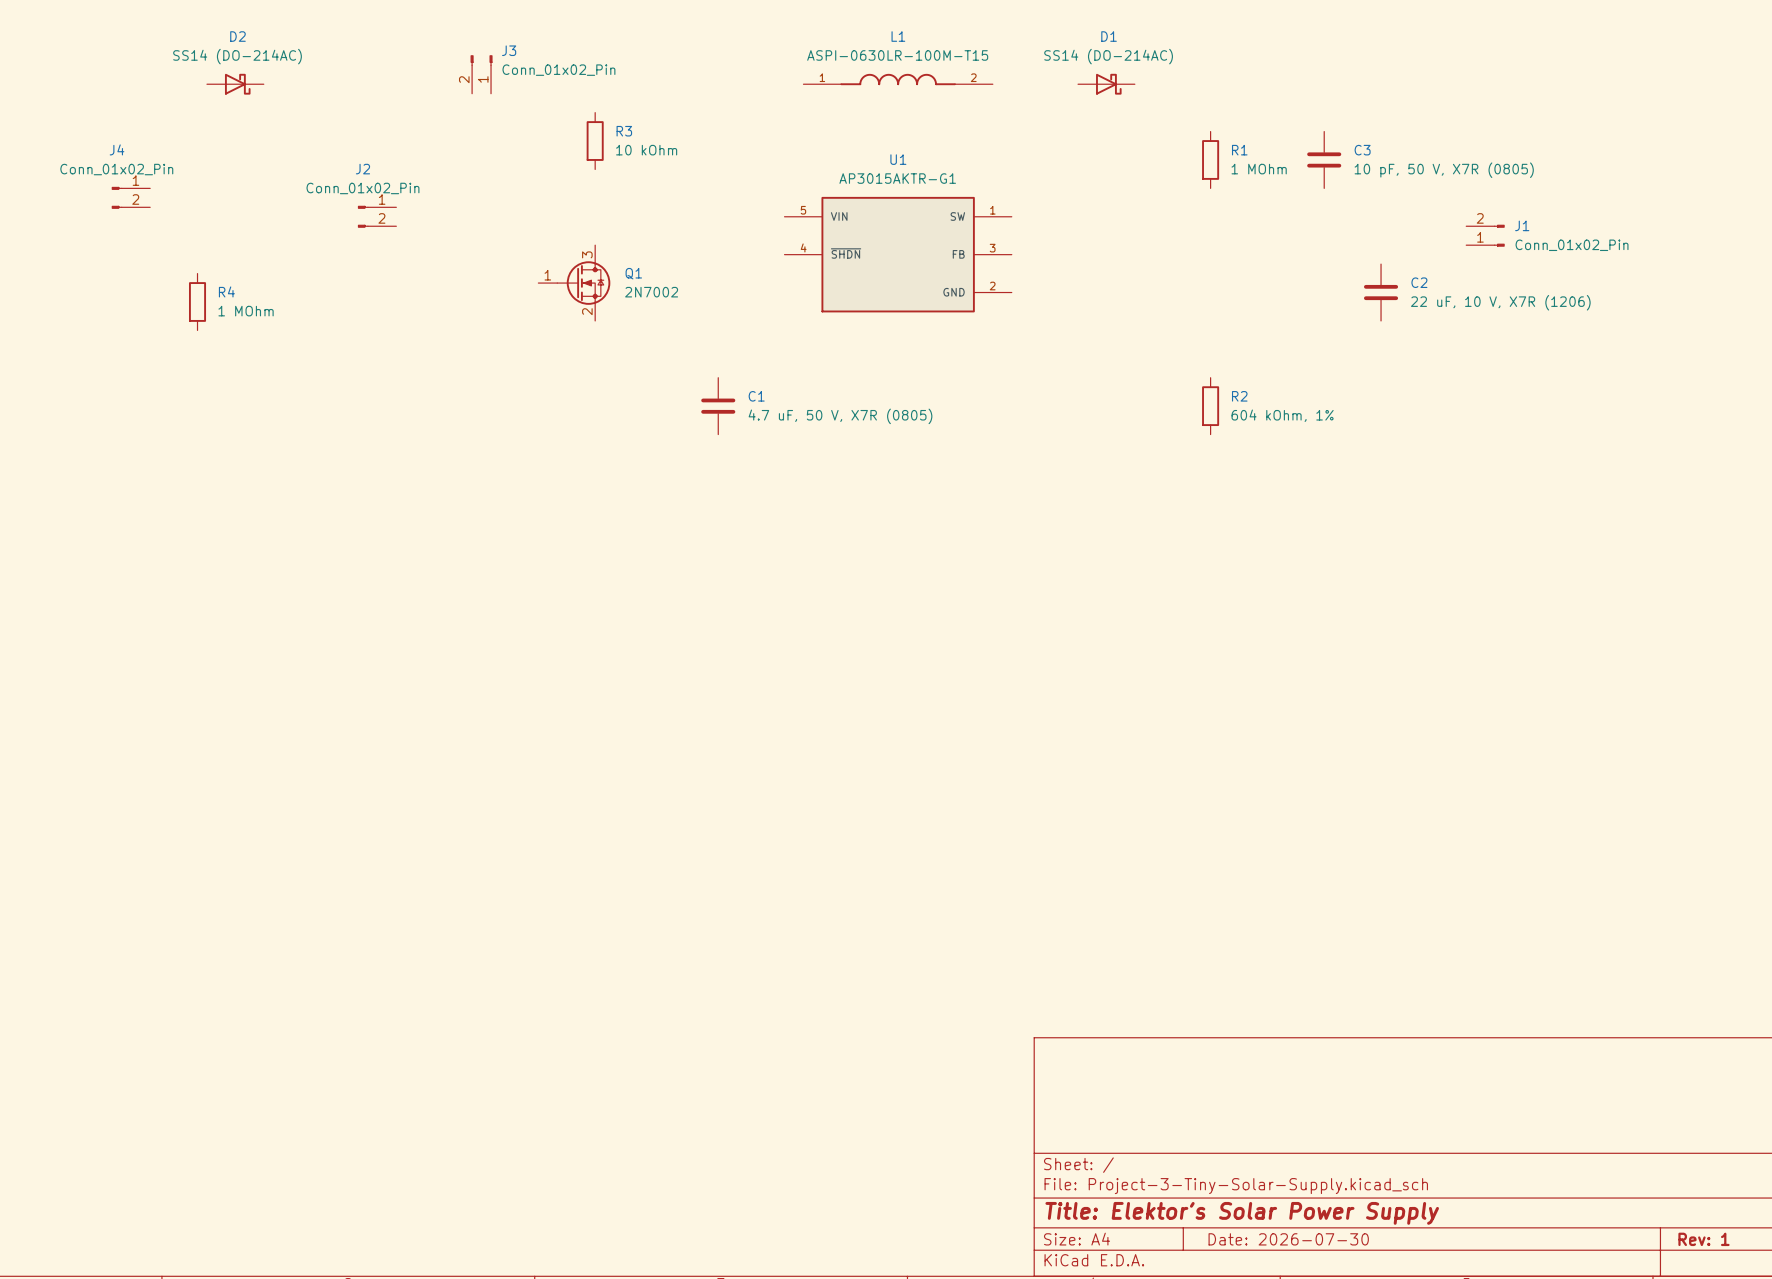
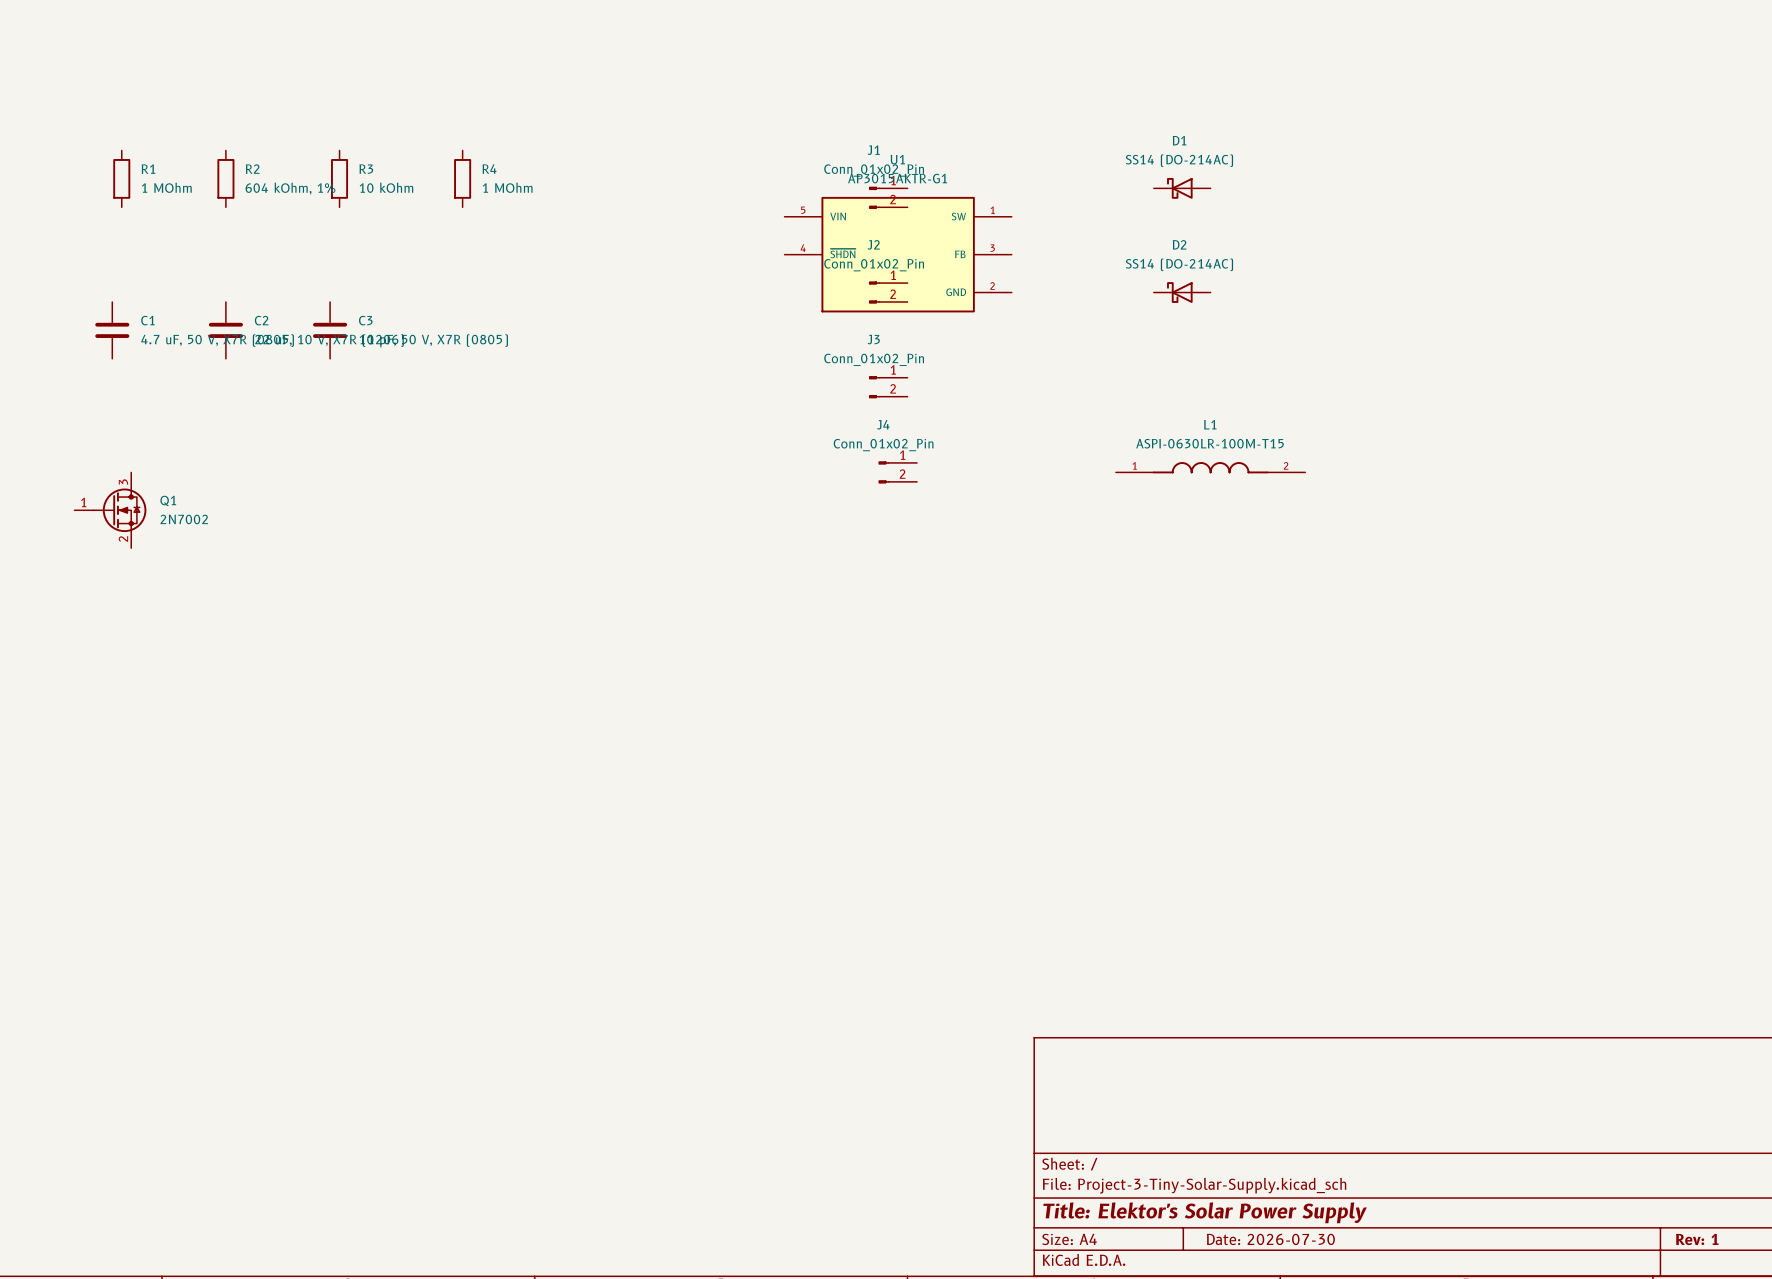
J3 name position: J3 (509, 50) -> J3 (873, 339)
J3 rotation: 0° (481, 60) -> 90° counterclockwise (874, 387)
J3 value position: Conn_01x02_Pin (558, 70) -> Conn_01x02_Pin (874, 359)
J3 position: (481, 74) -> (888, 387)
L1 position: (898, 79) -> (1210, 467)
D2 position: (235, 84) -> (1182, 292)
D2 rotation: 0° (237, 84) -> 180° (1179, 292)
D1 position: (1106, 84) -> (1182, 188)
D1 rotation: 0° (1108, 84) -> 180° (1179, 188)
R3 position: (595, 141) -> (339, 178)
R1 position: (1210, 159) -> (121, 178)
C3 position: (1324, 159) -> (330, 330)
J4 position: (130, 197) -> (897, 472)
J2 position: (377, 216) -> (888, 292)
J1 name position: J1 (1522, 225) -> J1 (873, 150)
J1 position: (1485, 235) -> (888, 197)
J1 rotation: 0° (1499, 235) -> 180° (874, 197)
J1 value position: Conn_01x02_Pin (1572, 245) -> Conn_01x02_Pin (874, 170)
Q1 position: (574, 283) -> (110, 510)
C2 position: (1381, 292) -> (225, 330)
R4 position: (197, 301) -> (462, 178)
C1 position: (718, 406) -> (112, 330)
R2 position: (1210, 406) -> (225, 178)

